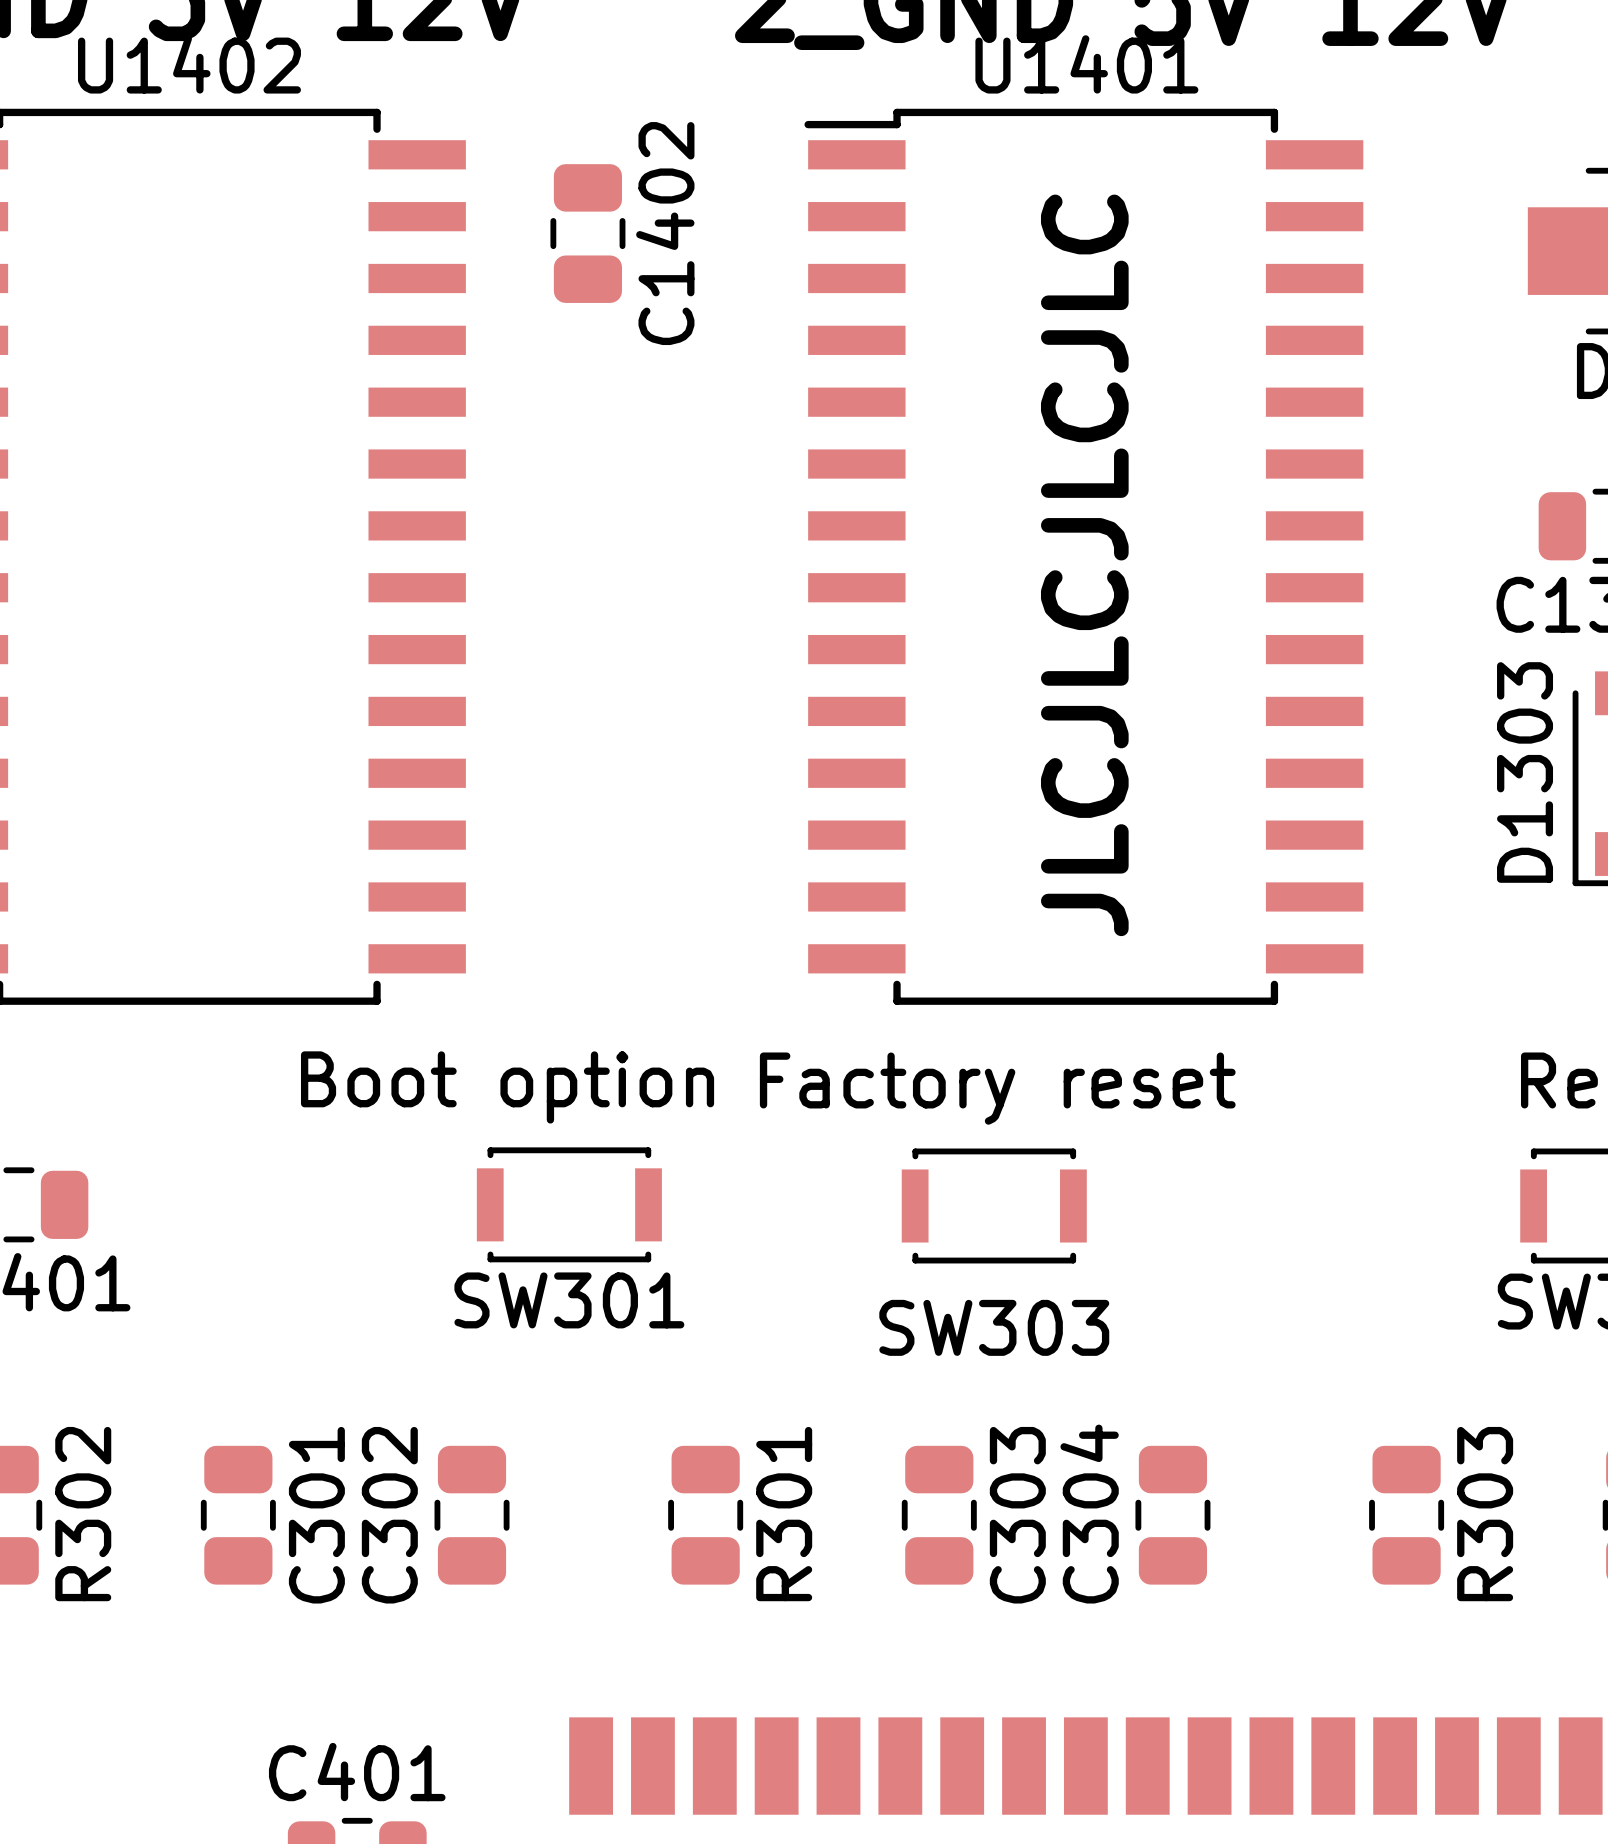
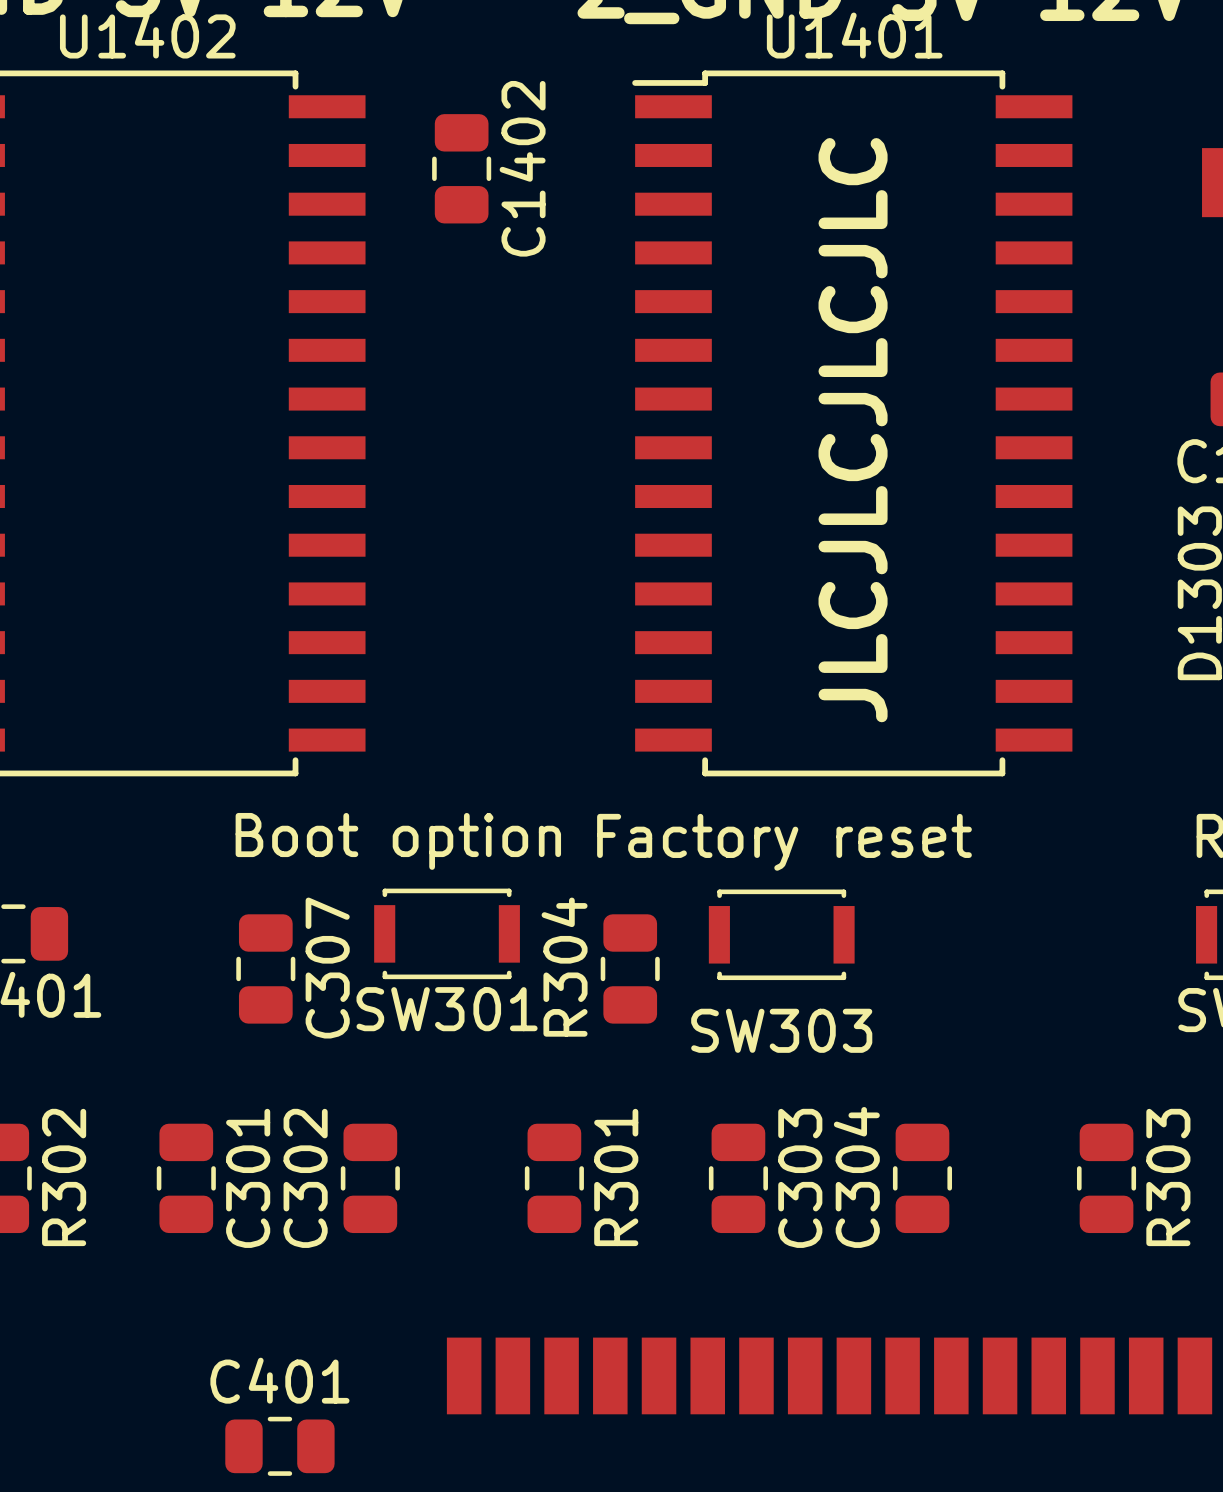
C307: none -> (265, 968)
R304: none -> (630, 968)

